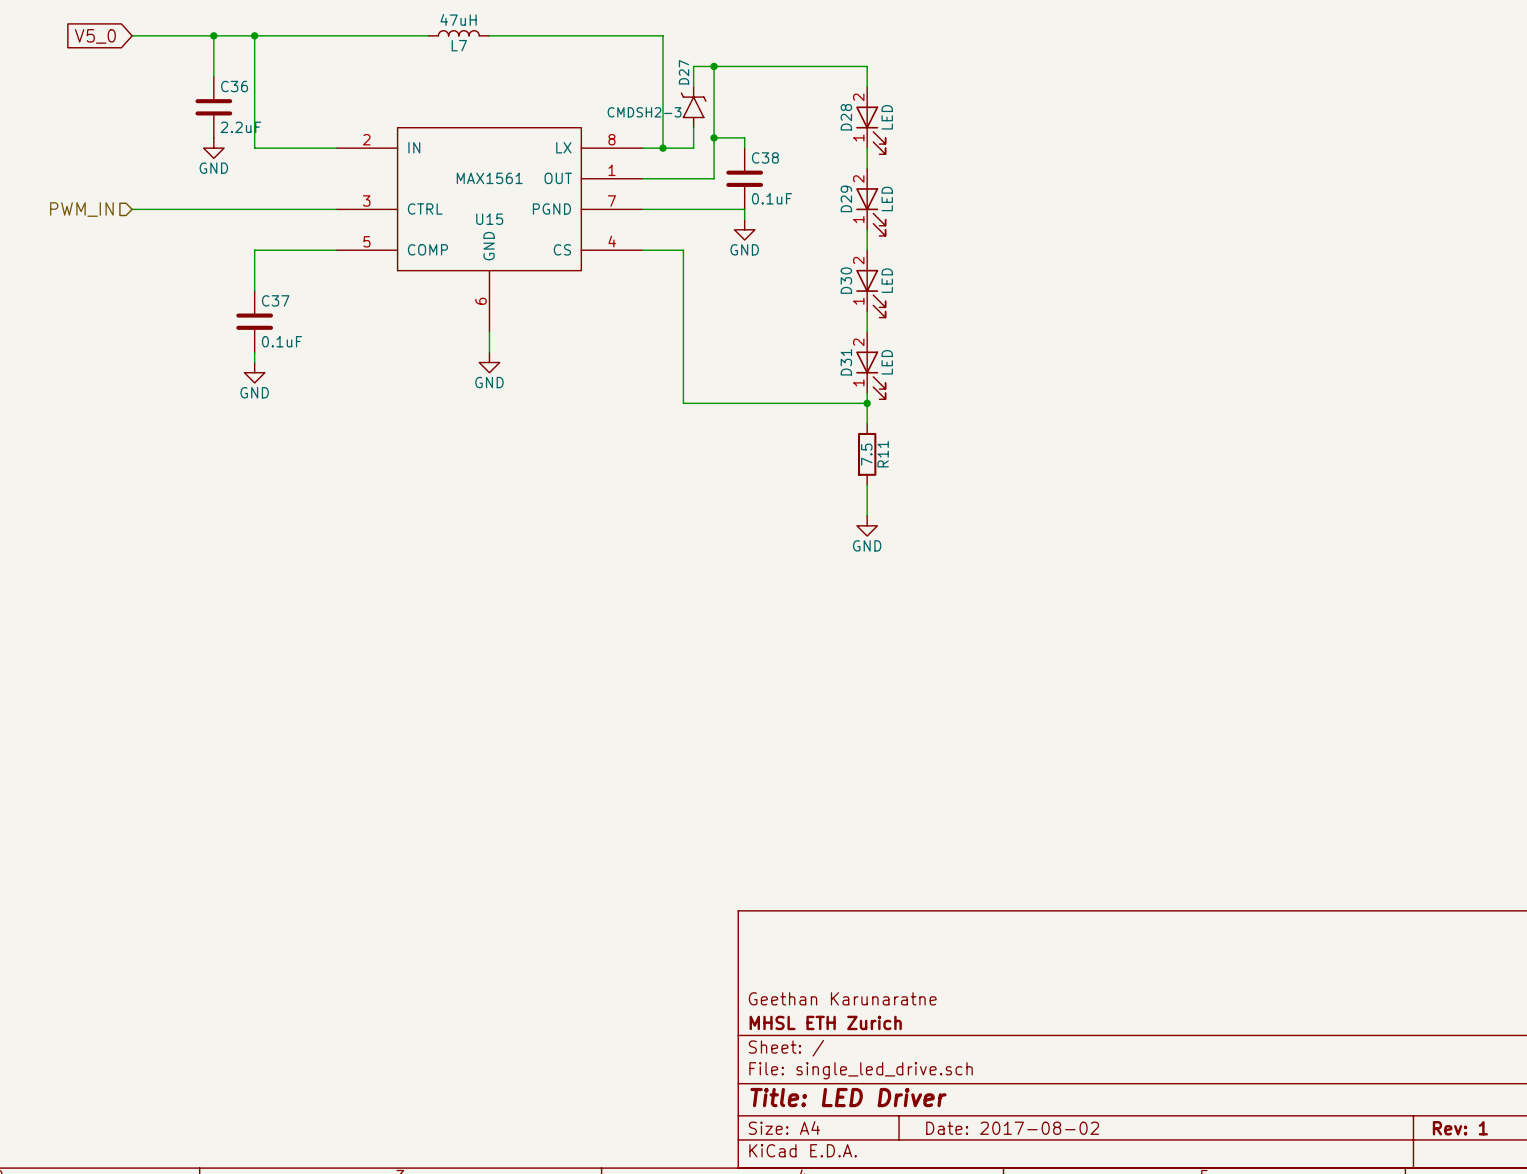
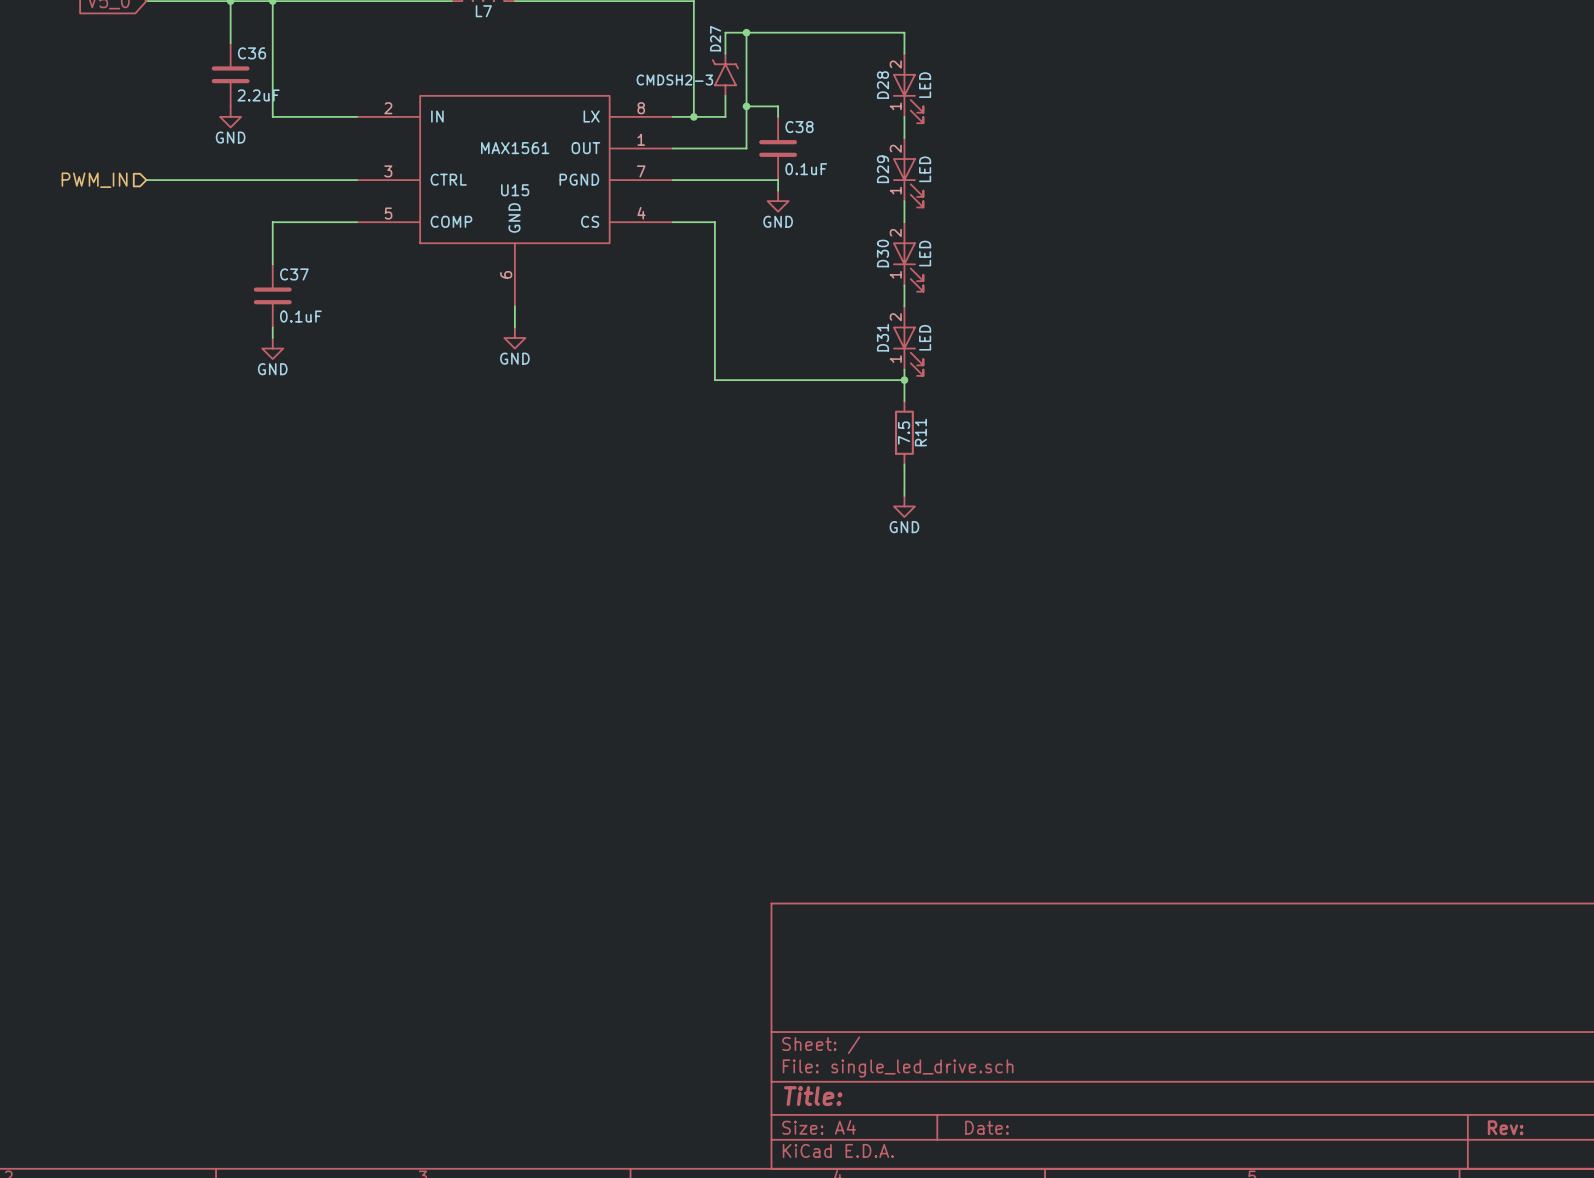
title block: Geethan Karunaratne (842, 998) -> none
title block: MHSL ETH Zurich (825, 1022) -> none
title block: Title: LED Driver (848, 1097) -> Title: (813, 1096)
title block: Date: 2017-08-02 (1012, 1128) -> Date: (986, 1127)
title block: Rev: 1 (1460, 1128) -> Rev: (1505, 1127)

